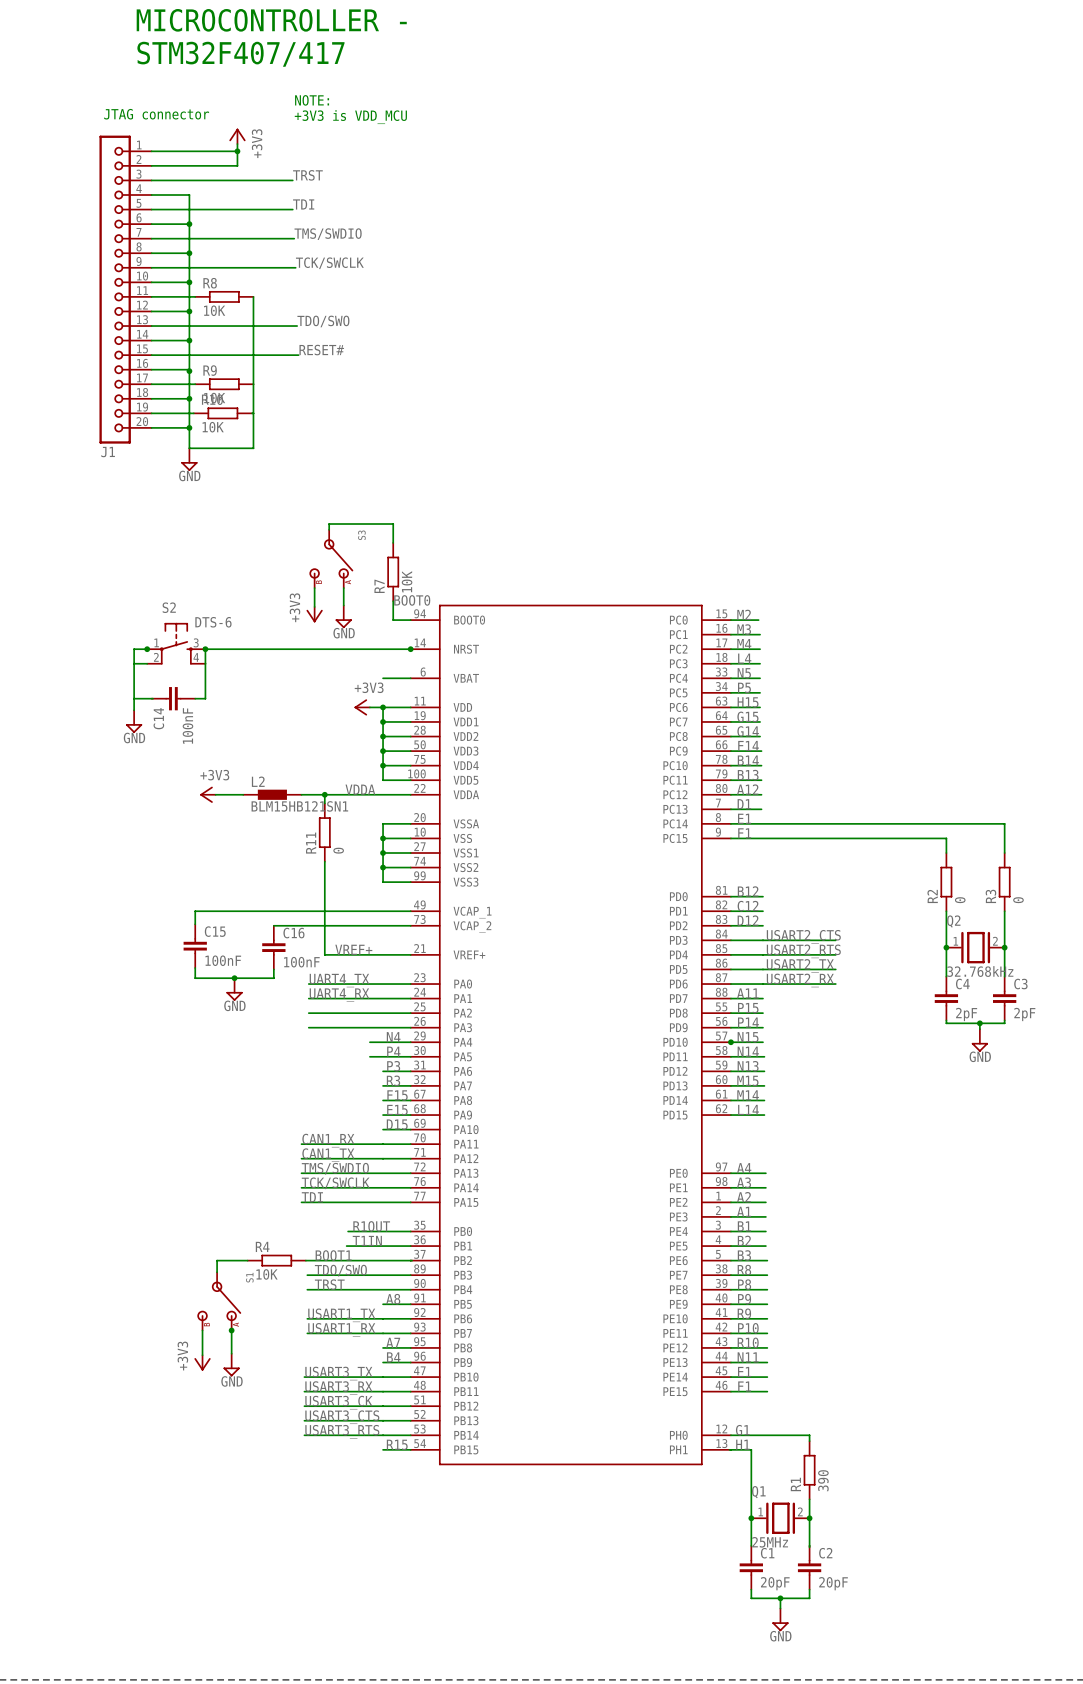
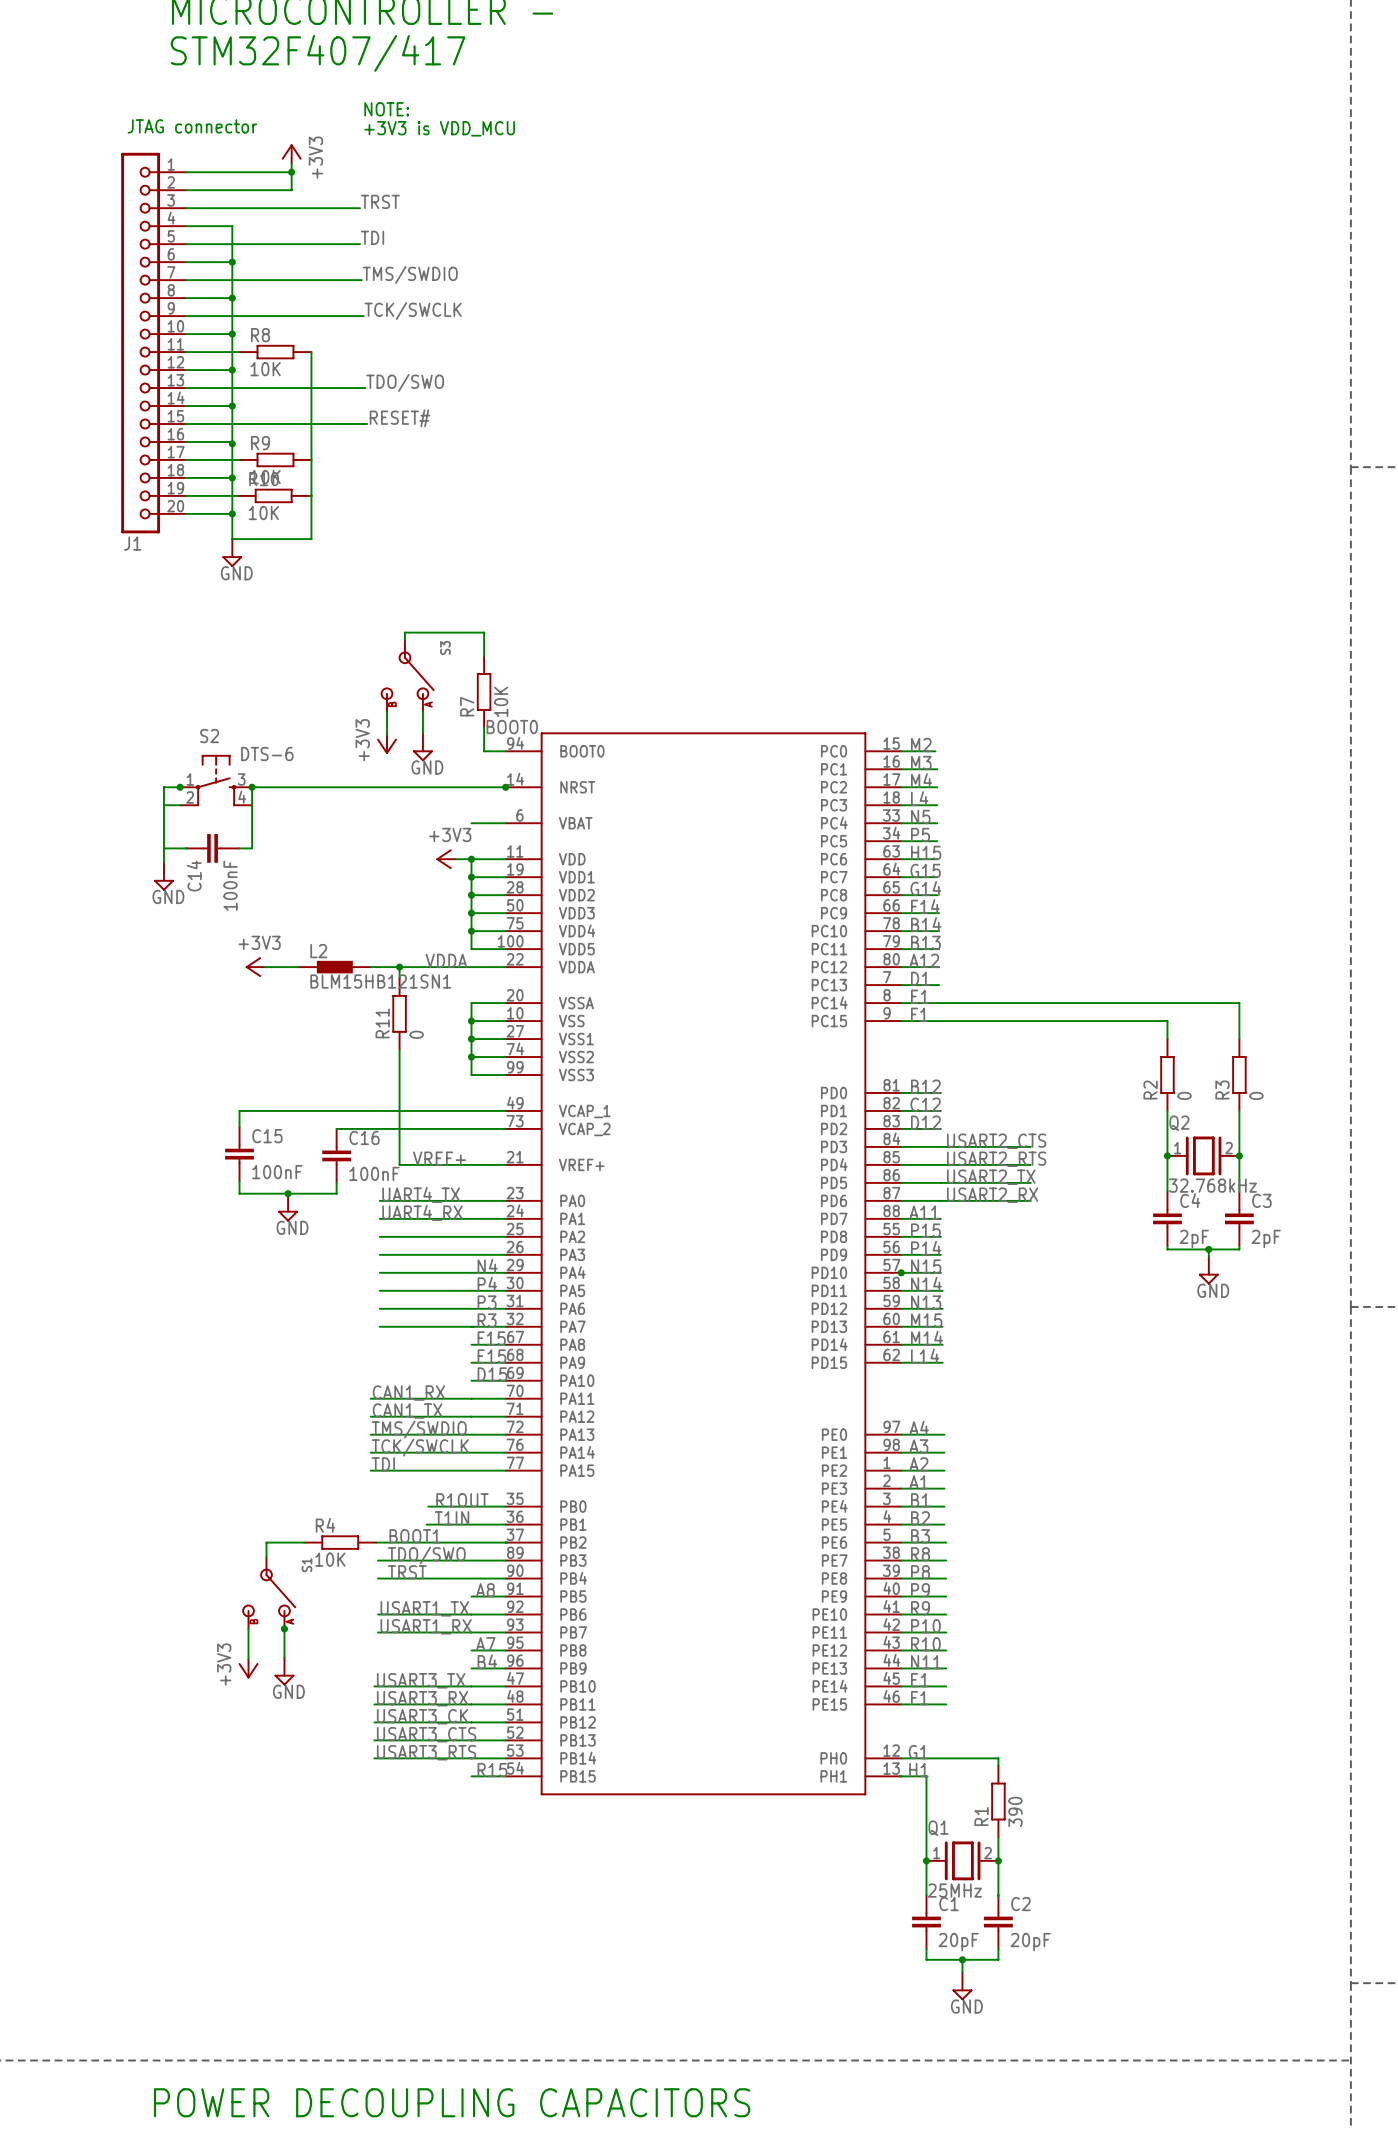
wire: none -> (379, 1272) (455, 1272)
wire: none -> (379, 1290) (455, 1290)
wire: none -> (379, 1308) (471, 1308)
wire: none -> (379, 1326) (471, 1326)

